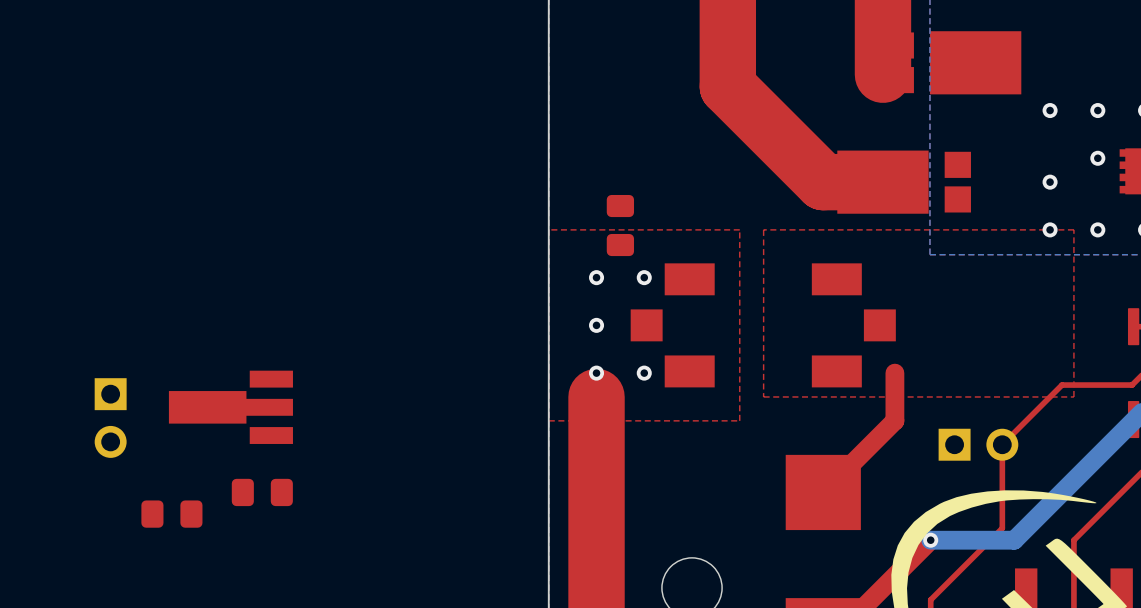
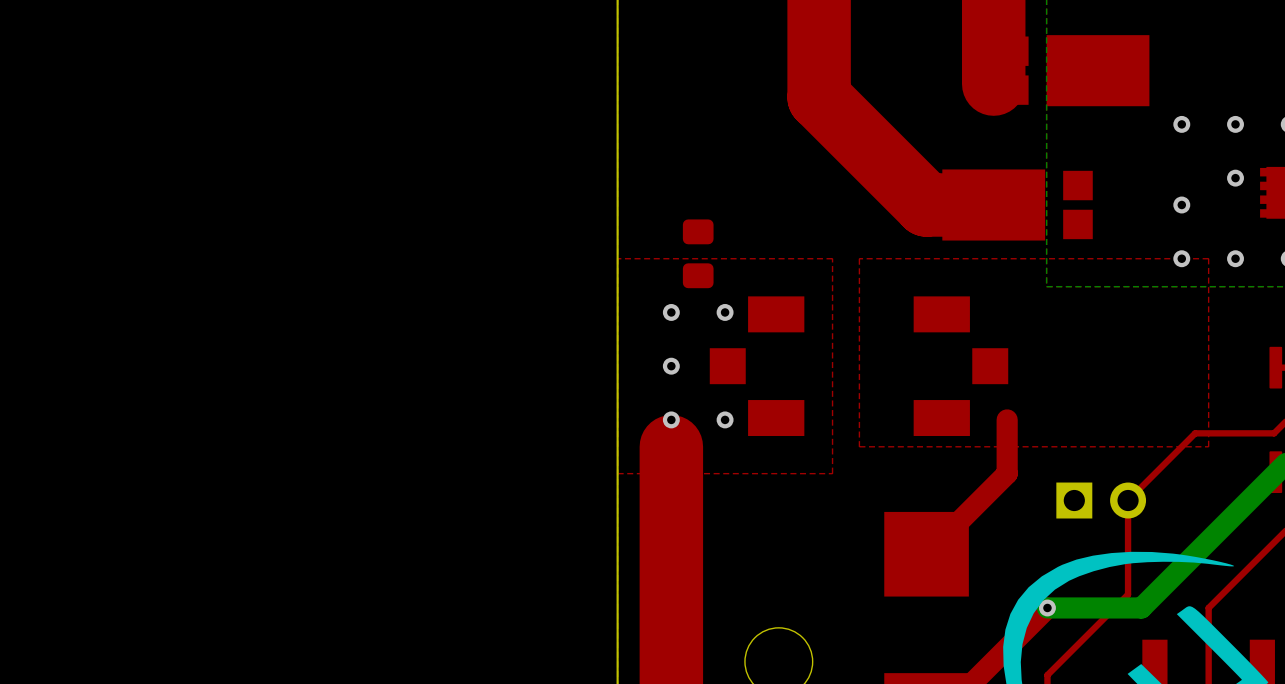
part: (230, 407) -> none
part: (110, 418) -> none
part: (262, 492) -> none
part: (171, 514) -> none

